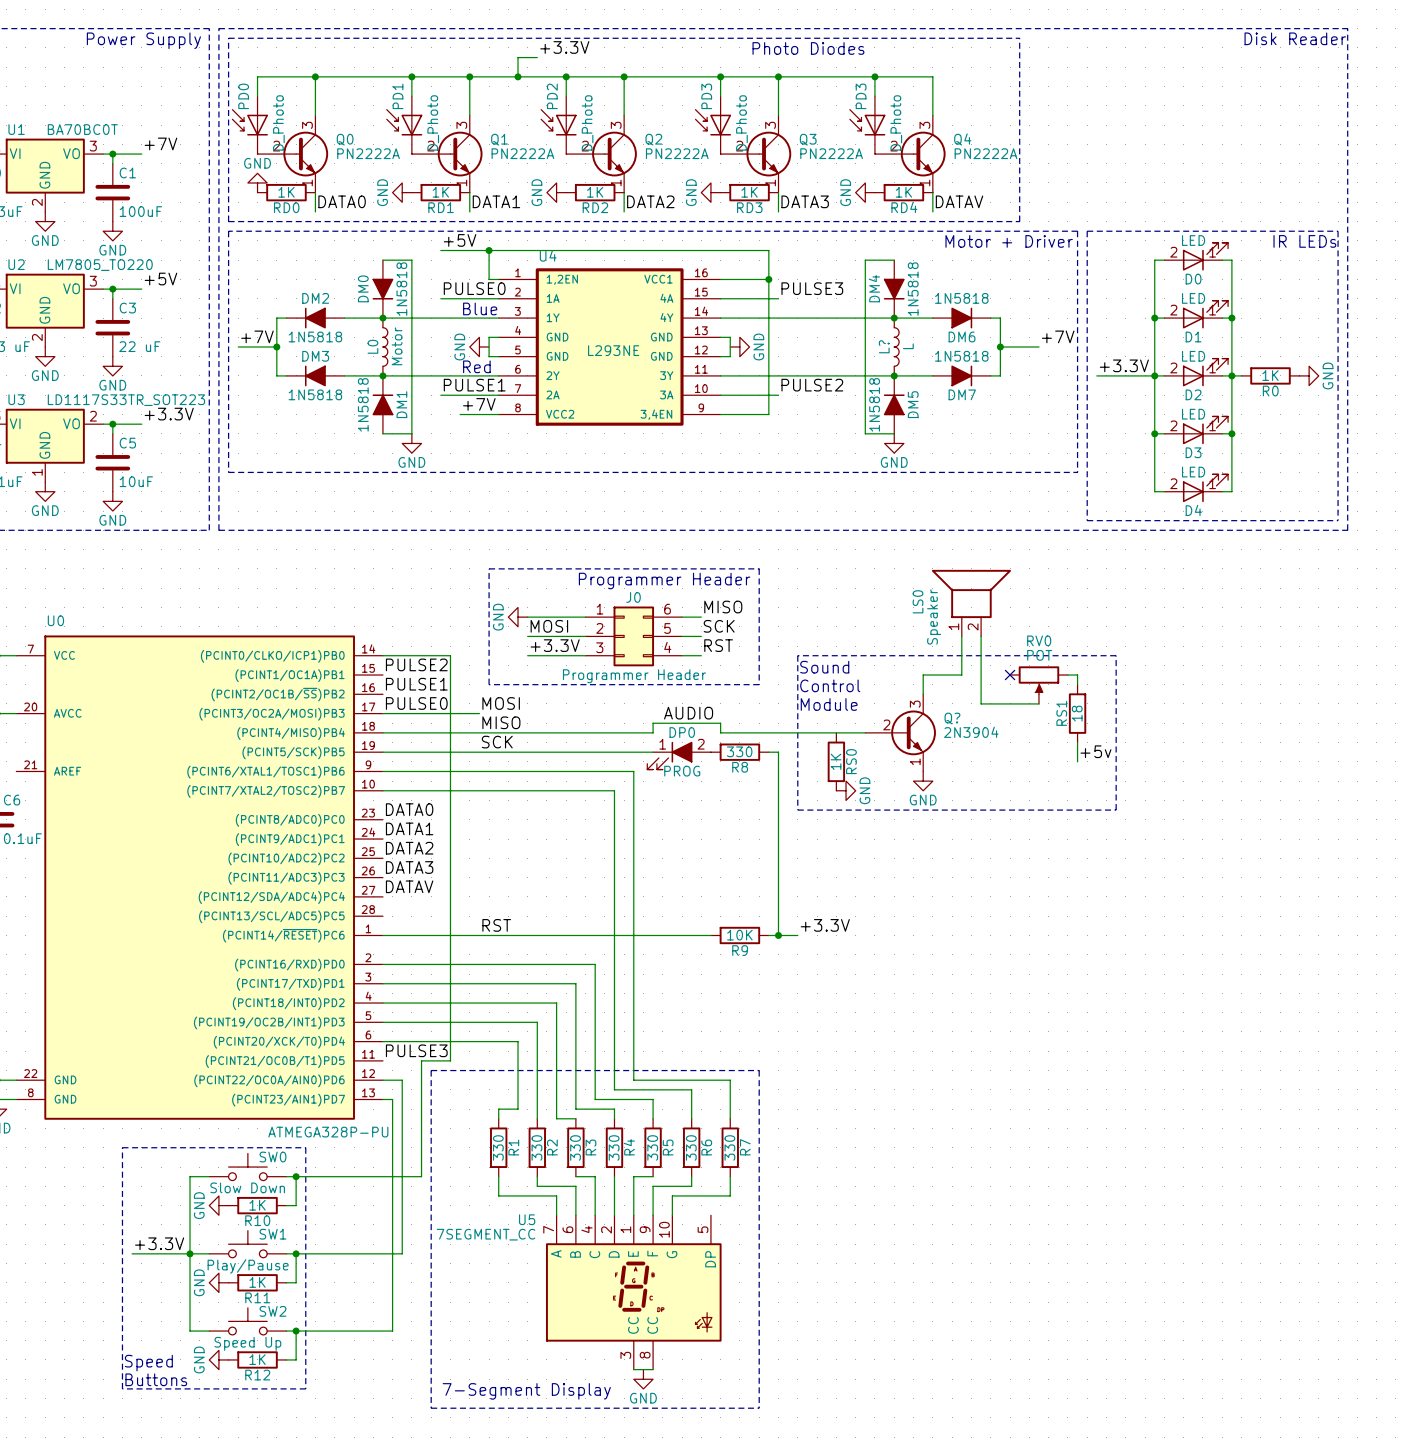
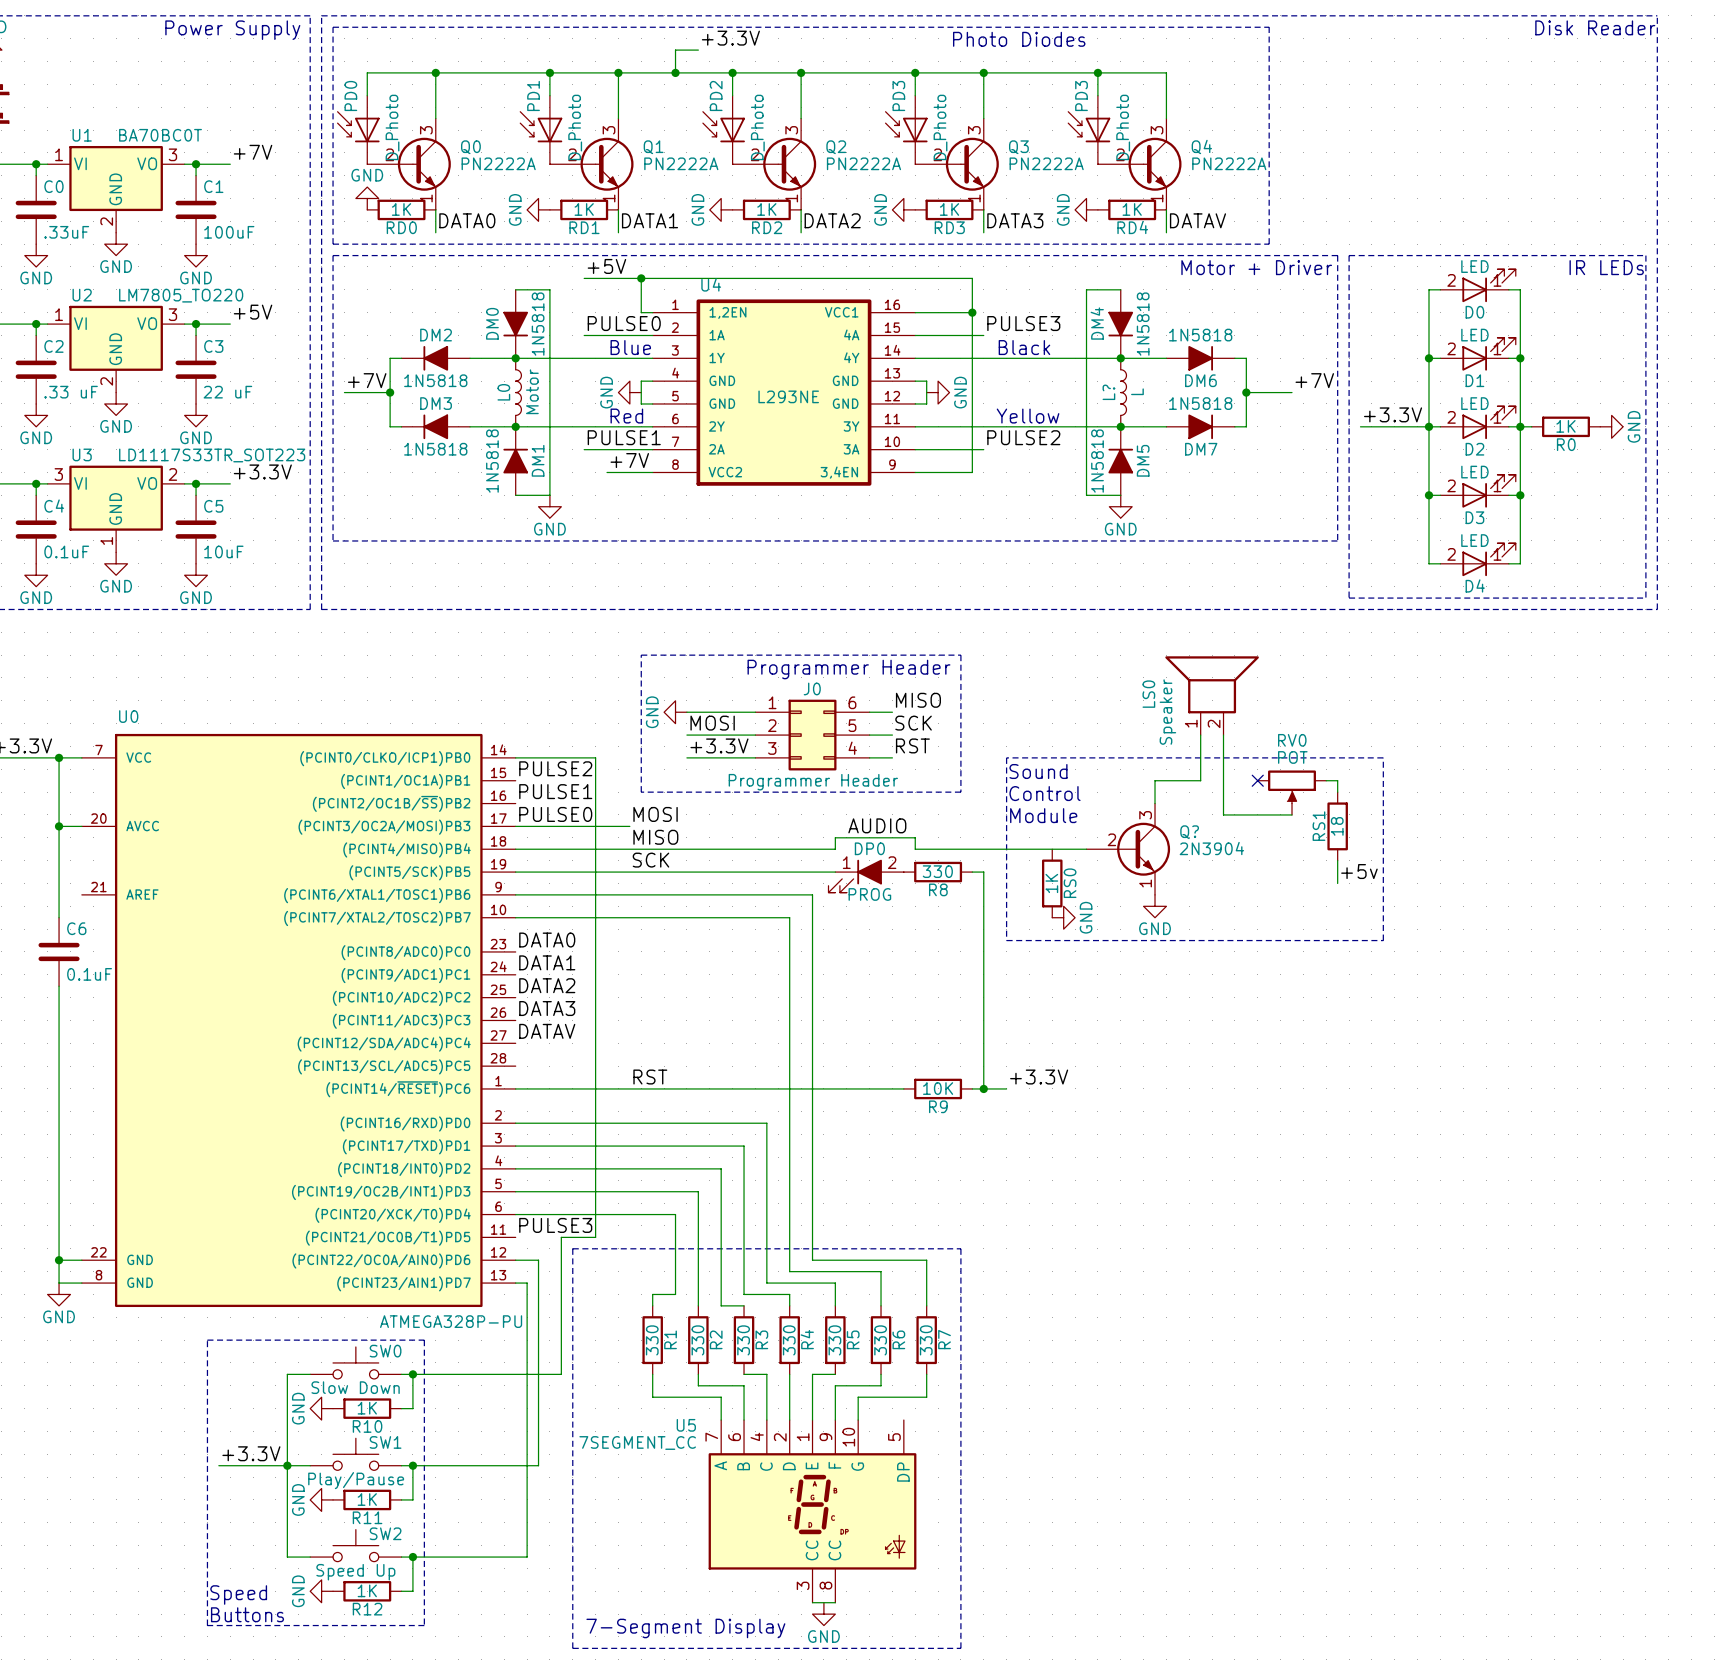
text: none -> Black (1024, 347)
text: none -> Yellow (1028, 416)

